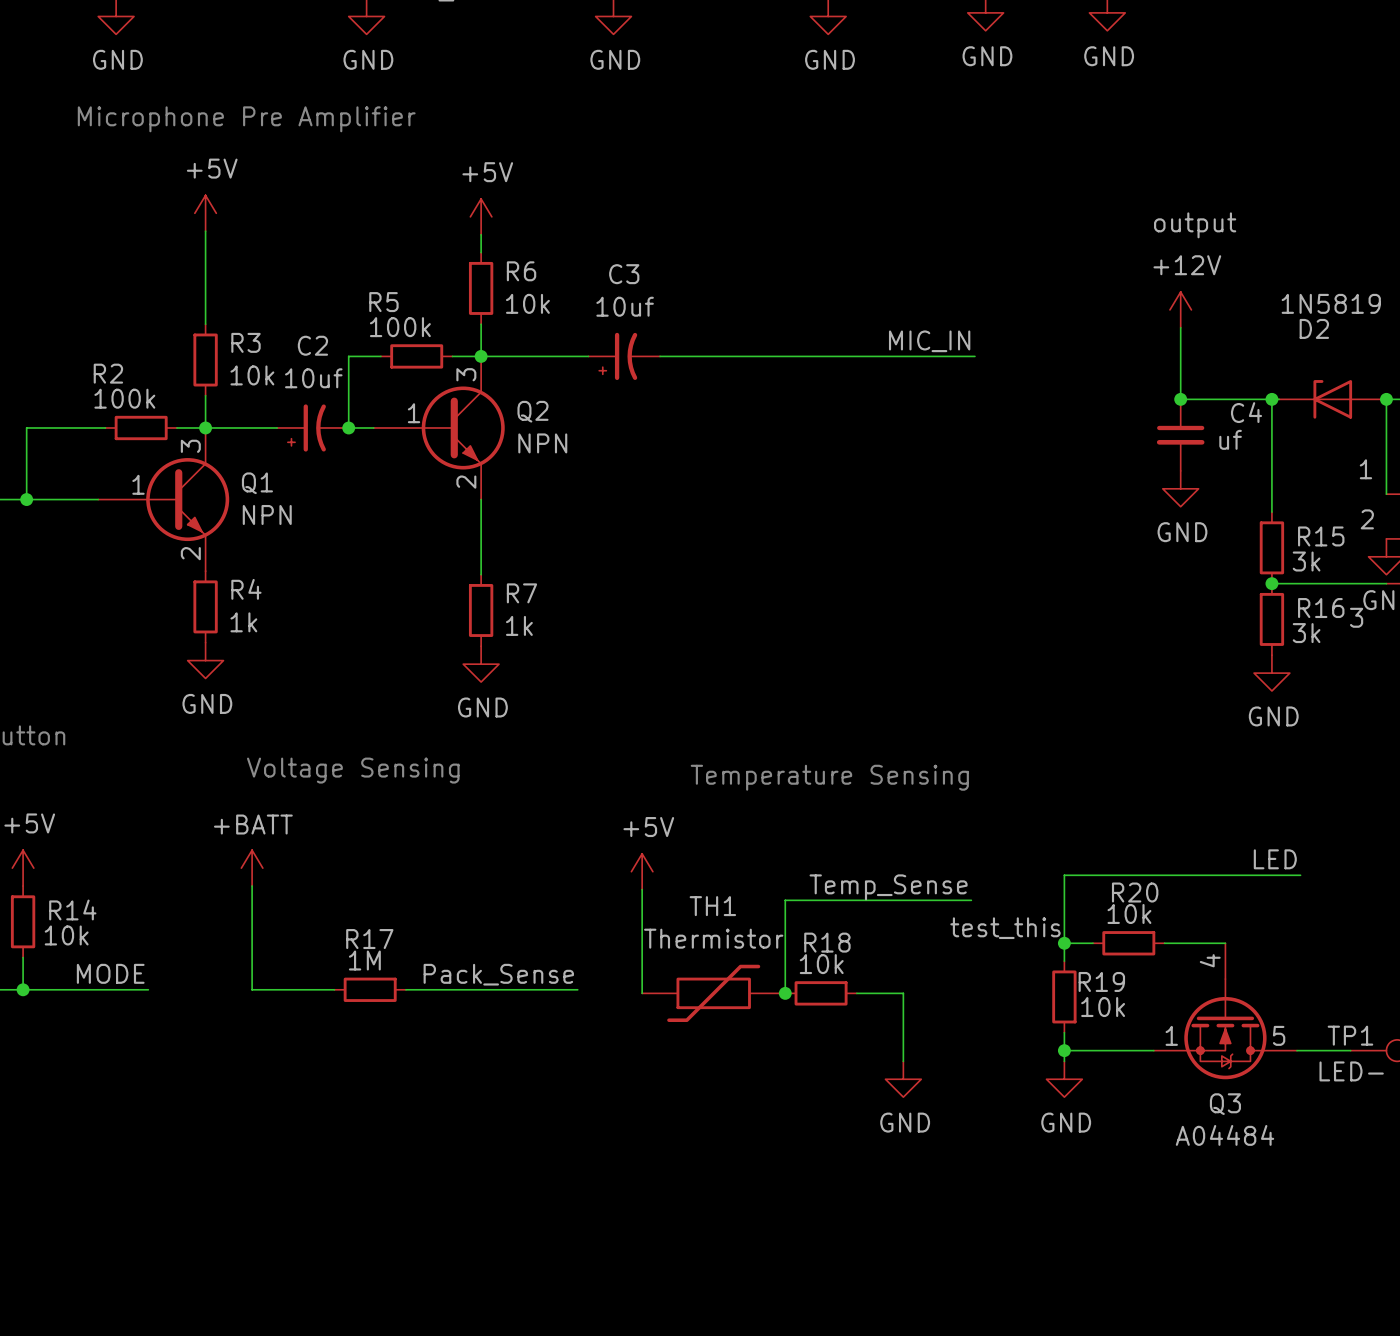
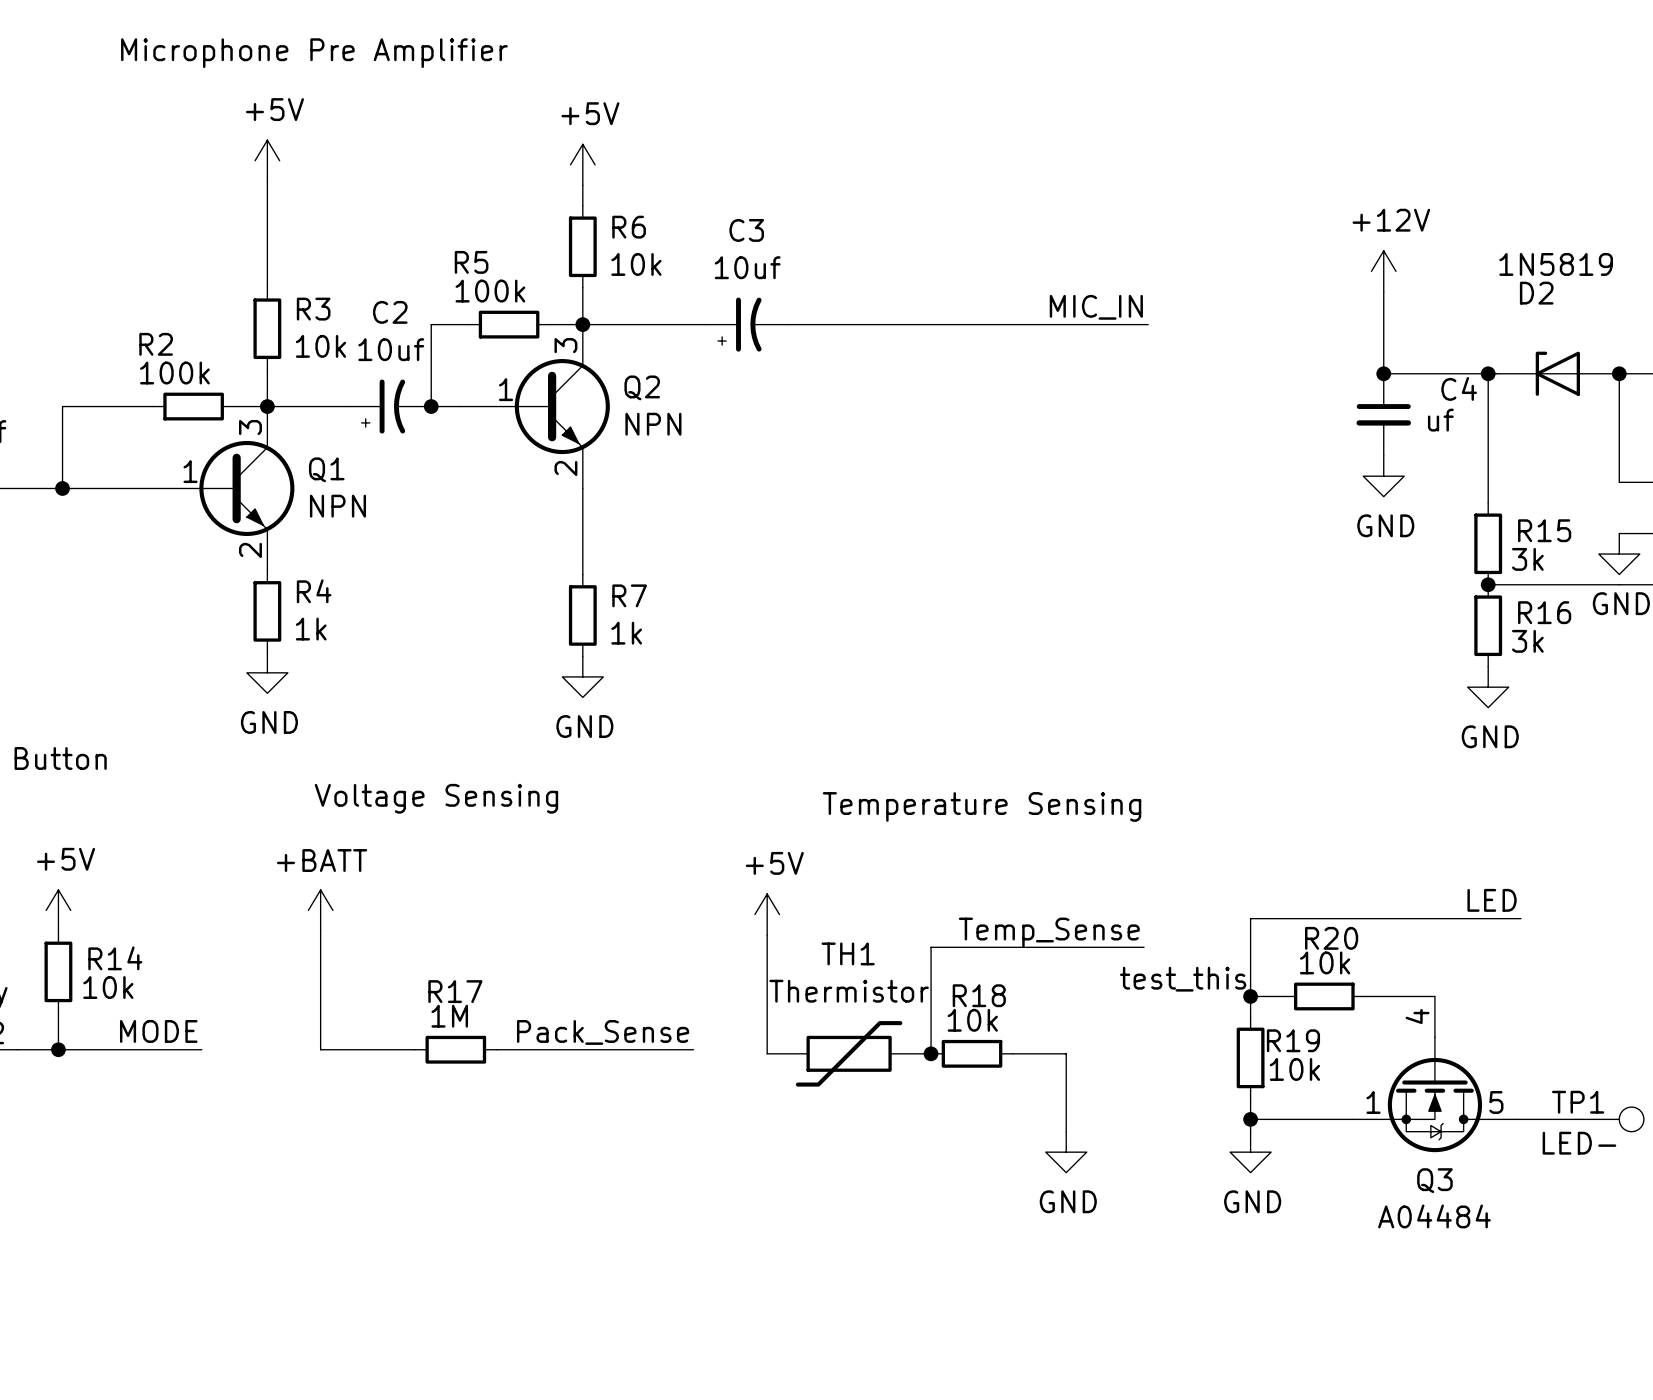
label: output (1195, 225) -> none
label: 1 (1365, 469) -> none
label: 2 (1367, 519) -> none
label: 3 (1356, 617) -> none

